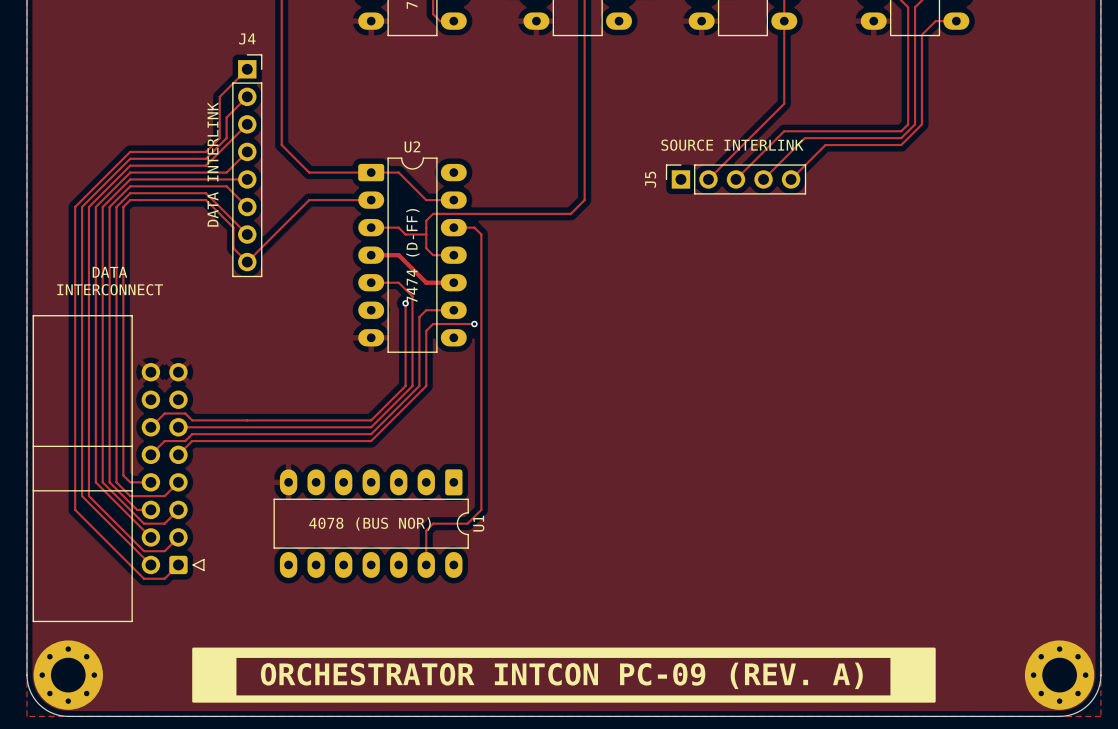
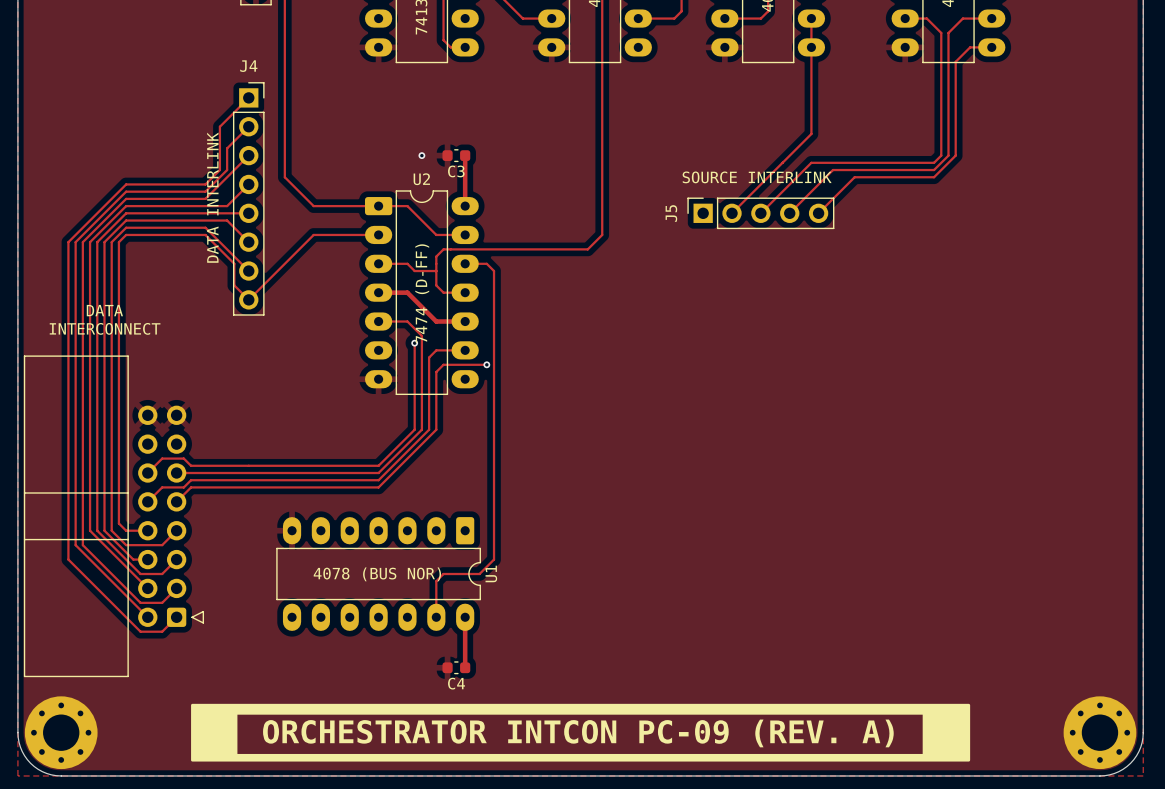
via: none -> (421, 155)
C3: none -> (456, 155)
track: none -> (465, 155) (465, 206)
track: none -> (465, 617) (465, 667)
C4: none -> (456, 667)

